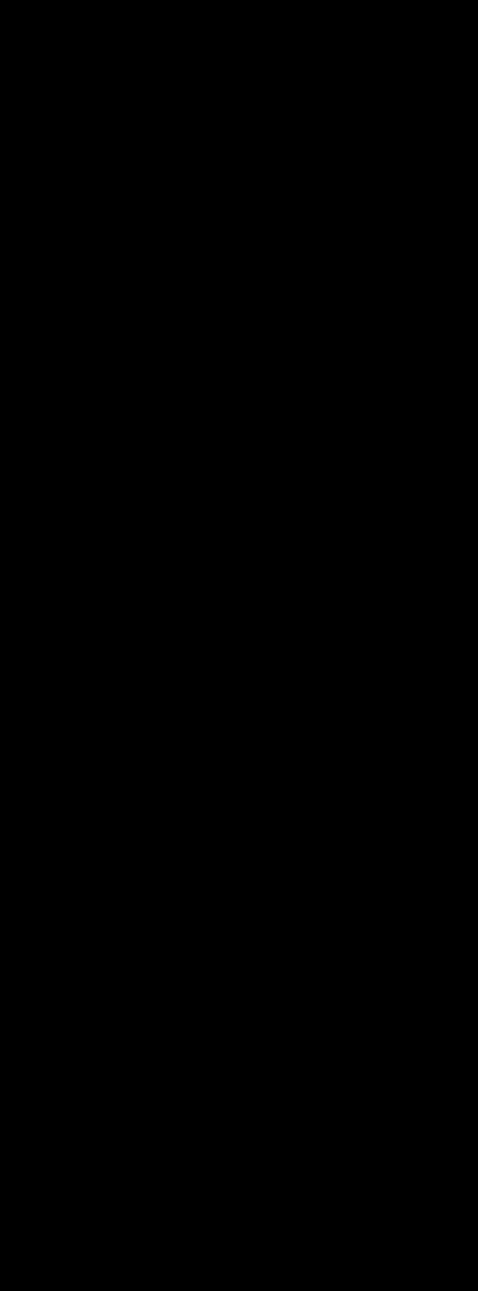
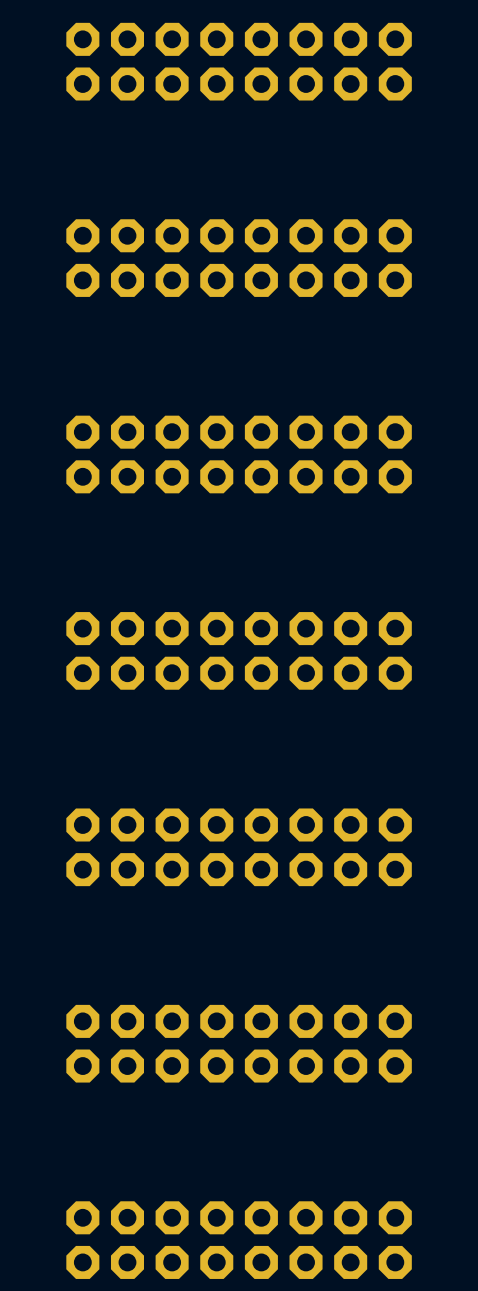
part: none -> (239, 61)
part: none -> (239, 258)
part: none -> (239, 454)
part: none -> (239, 650)
part: none -> (239, 847)
part: none -> (239, 1043)
part: none -> (239, 1240)

